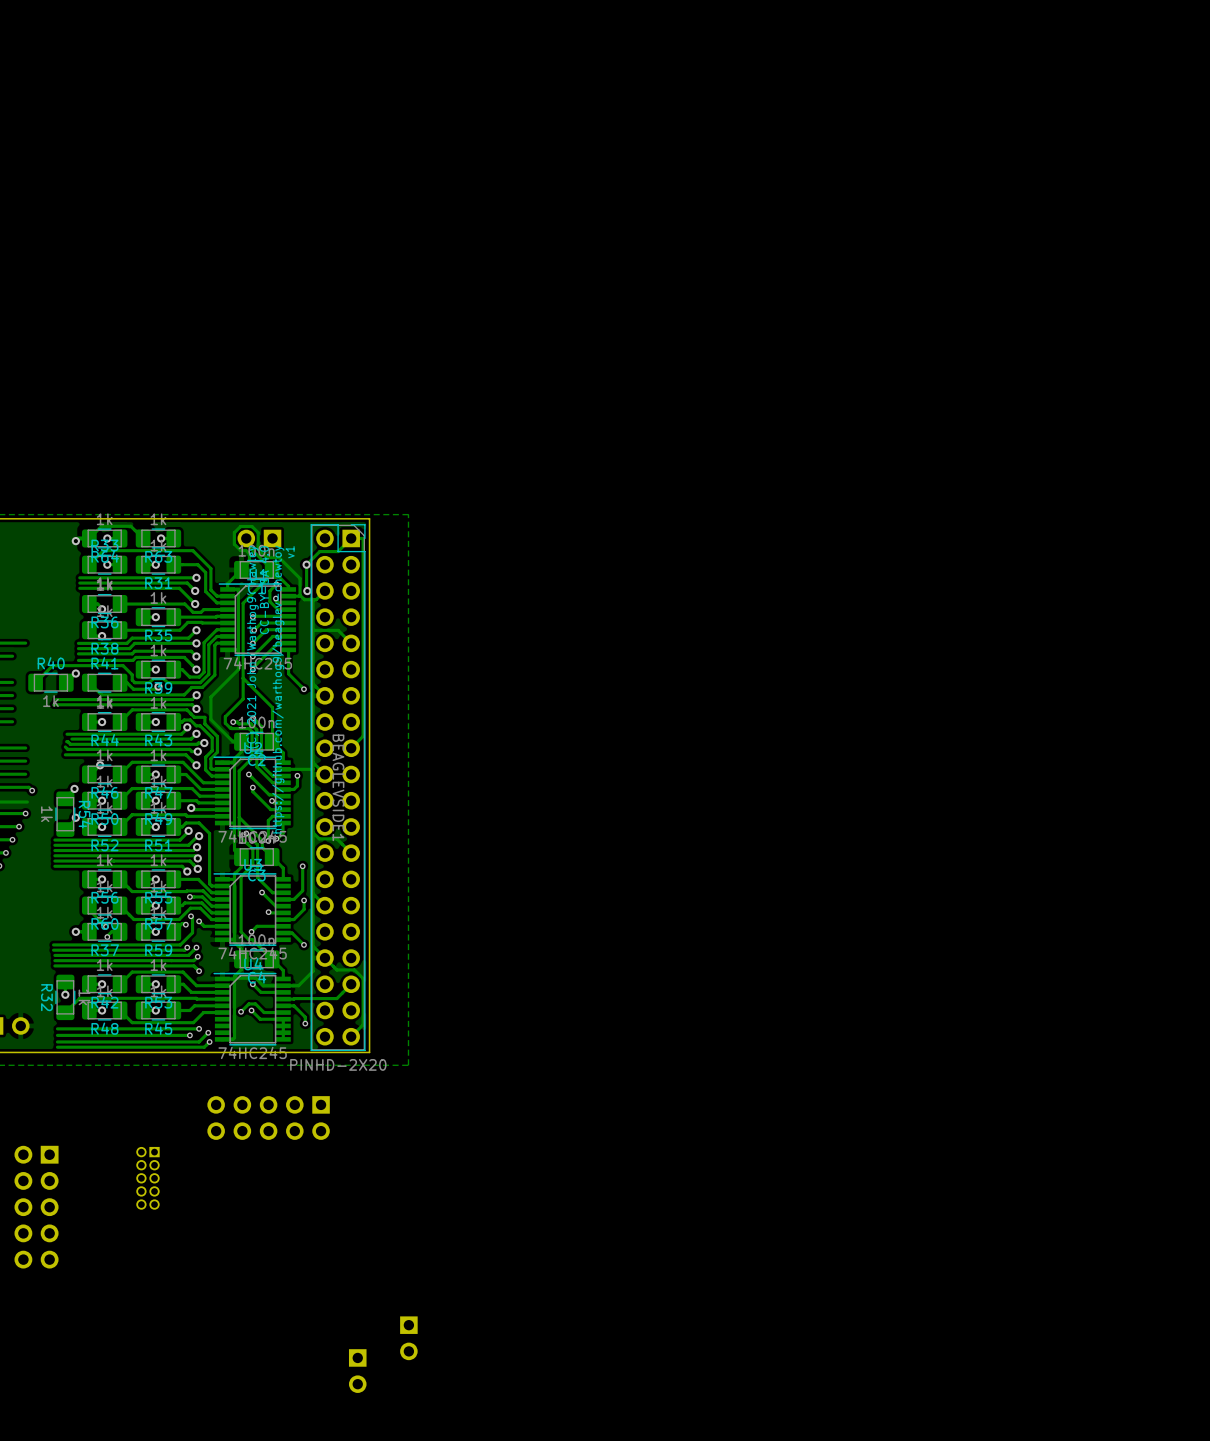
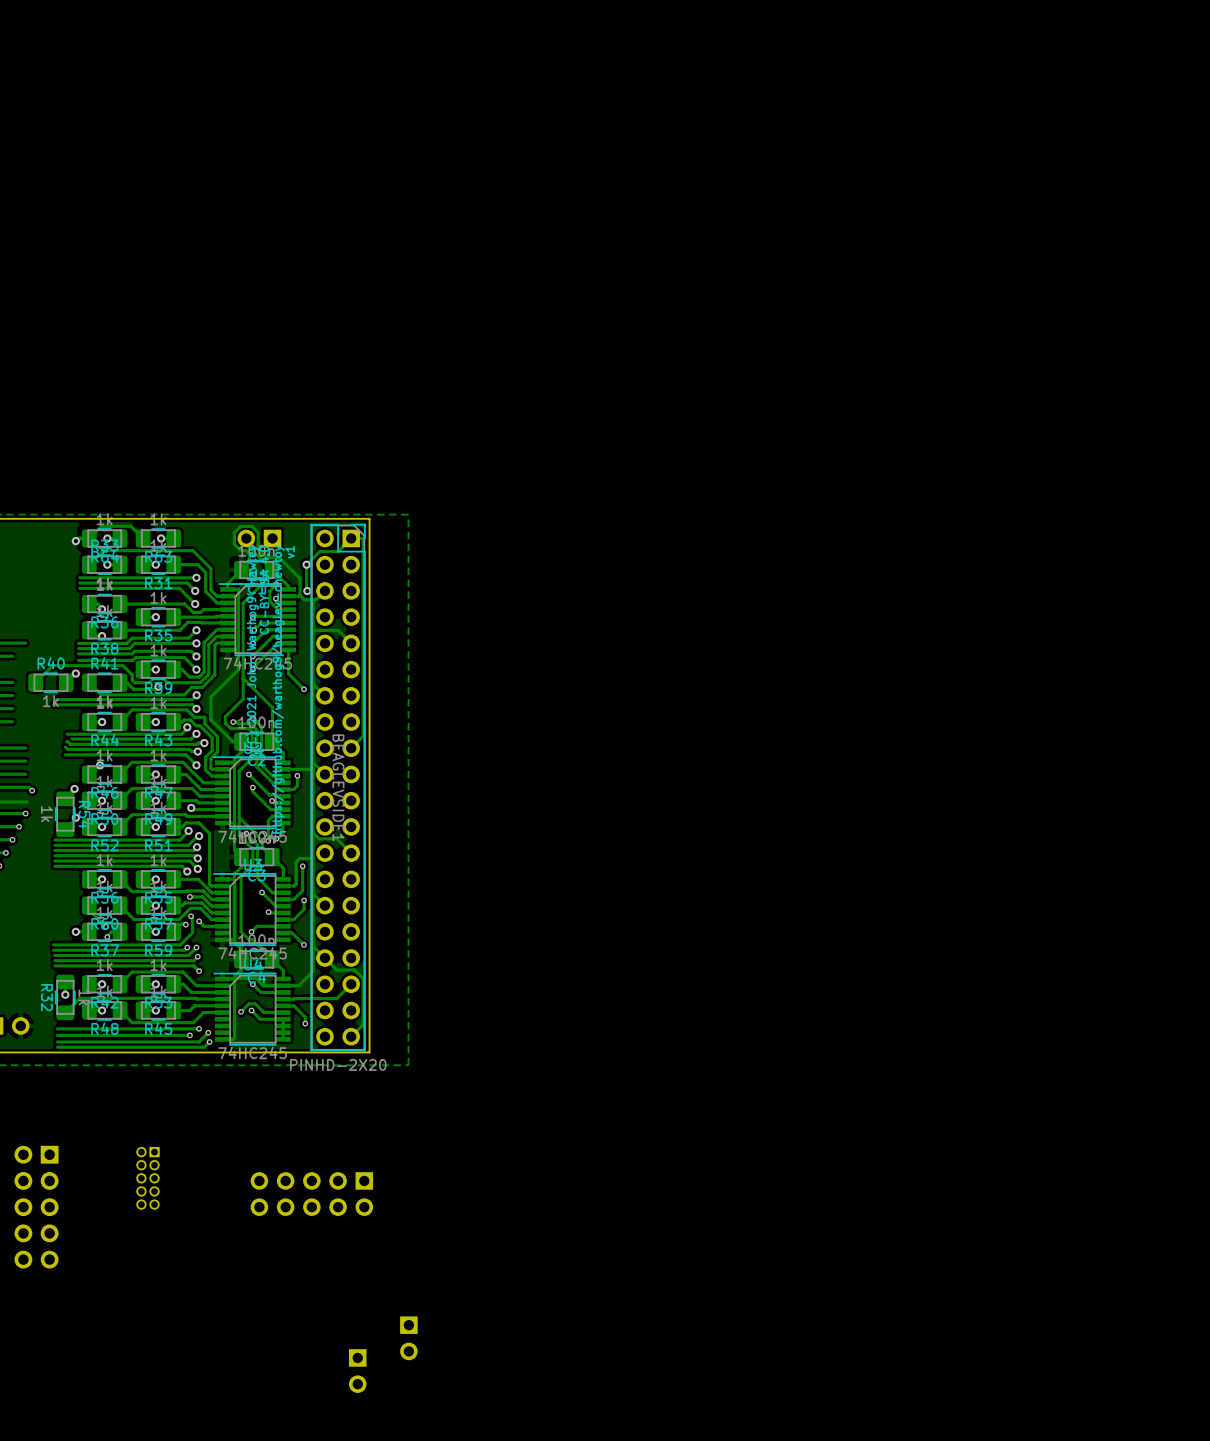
track: none -> (300, 858) (296, 862) (296, 883) (293, 886) (283, 886)
track: none -> (313, 858) (300, 858)
part position: (268, 1118) -> (311, 1194)

